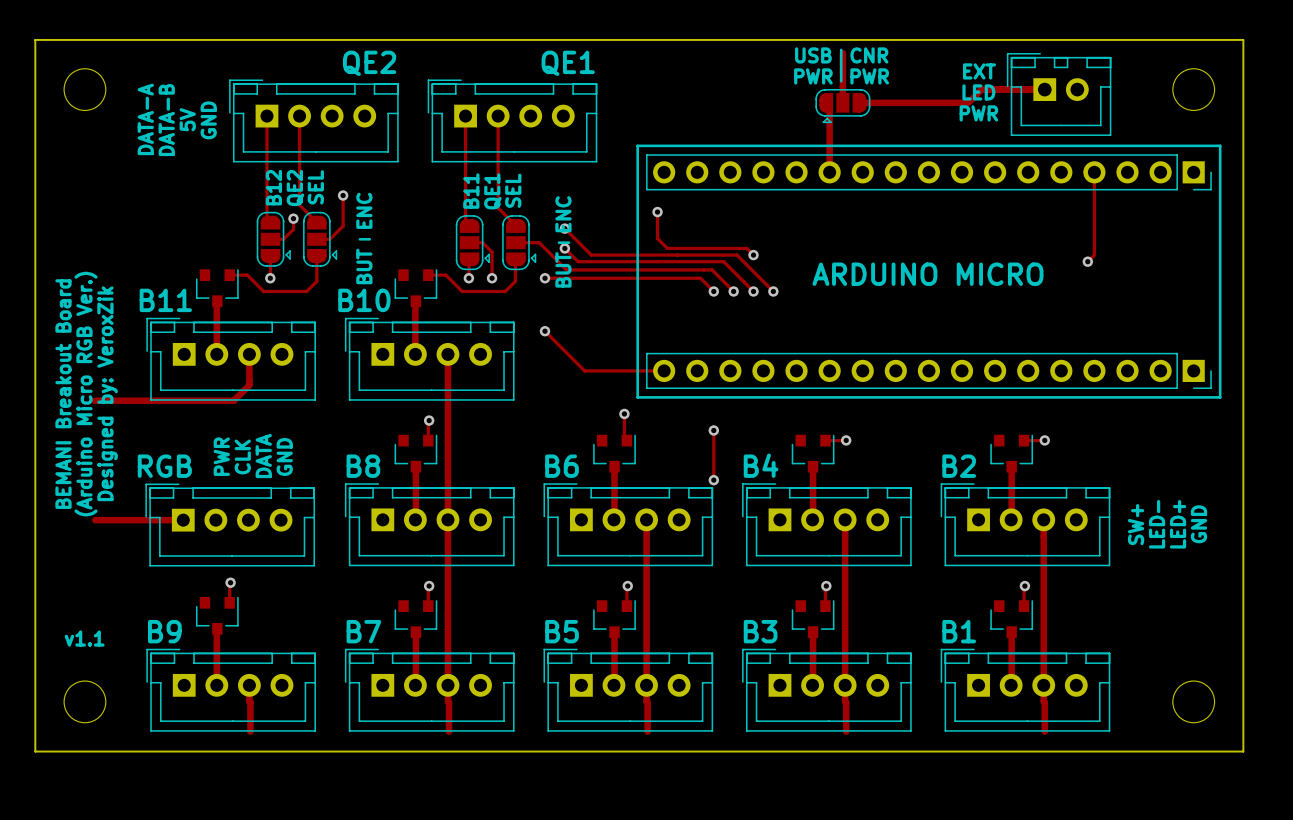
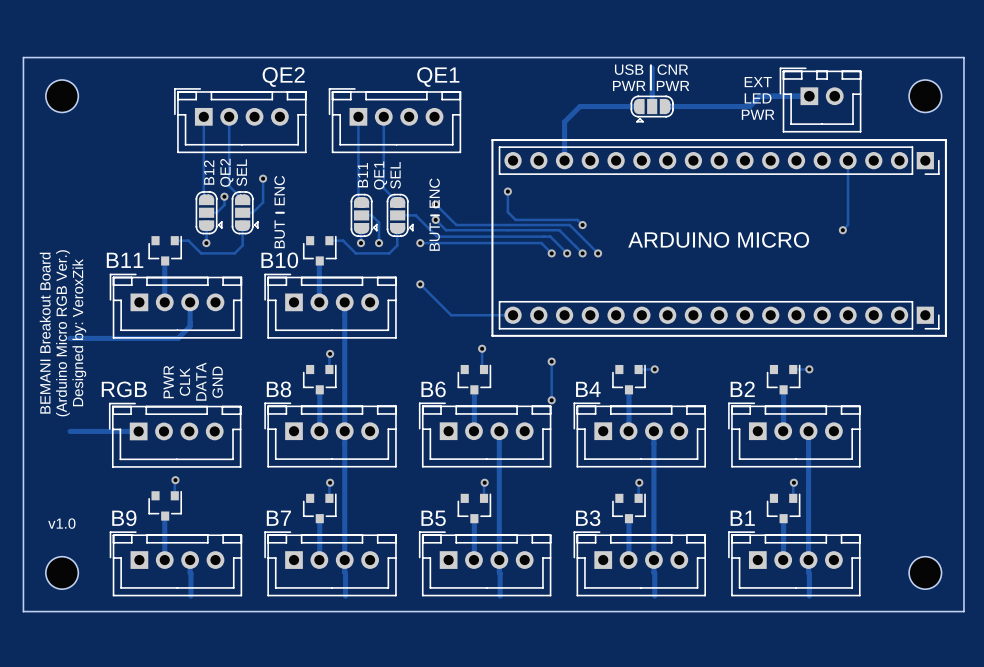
track: (825, 102) (829, 106) (829, 172) -> (639, 106) (580, 106) (564, 121) (564, 160)
text: DATA-A (145, 119) -> none
text: 5V (187, 119) -> none
text: DATA-B (166, 120) -> none
text: GND (208, 120) -> none
text: SW+ (1136, 524) -> none
text: LED- (1157, 524) -> none
text: LED+ (1178, 524) -> none
text: GND (1199, 524) -> none
text: v1.1 (84, 638) -> v1.0 (61, 523)

